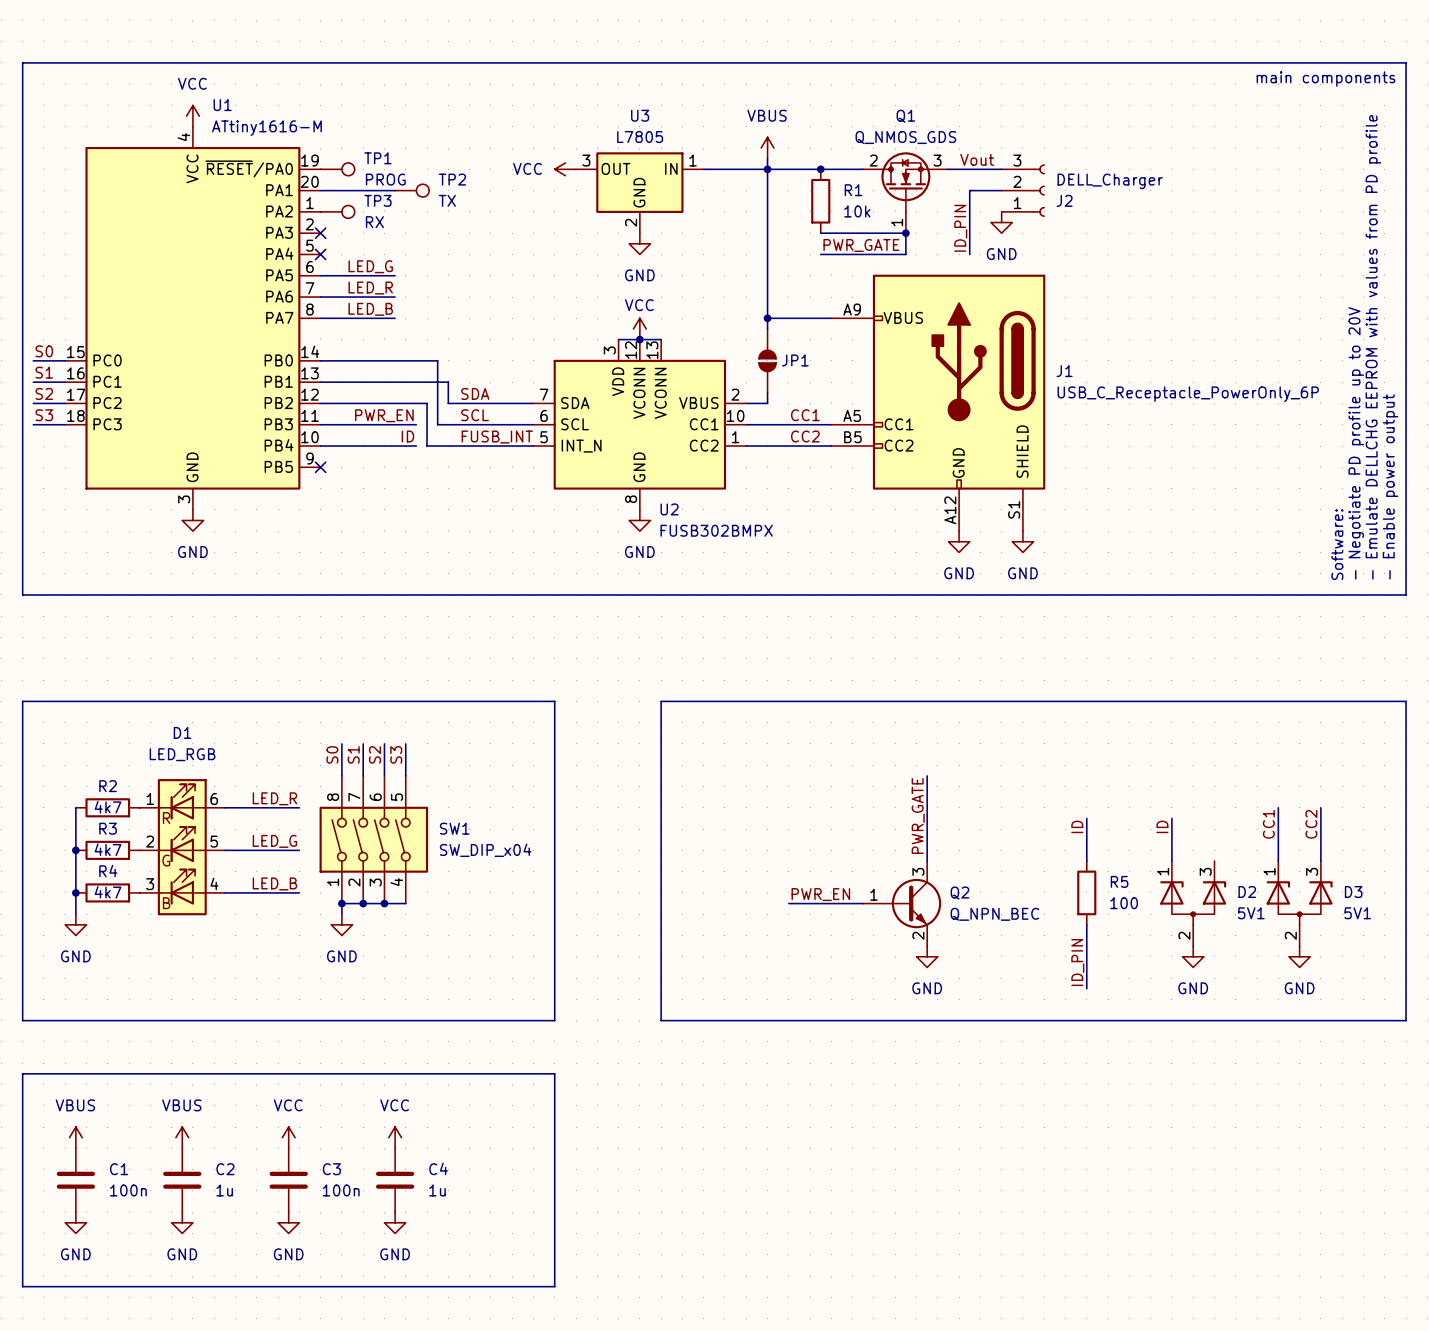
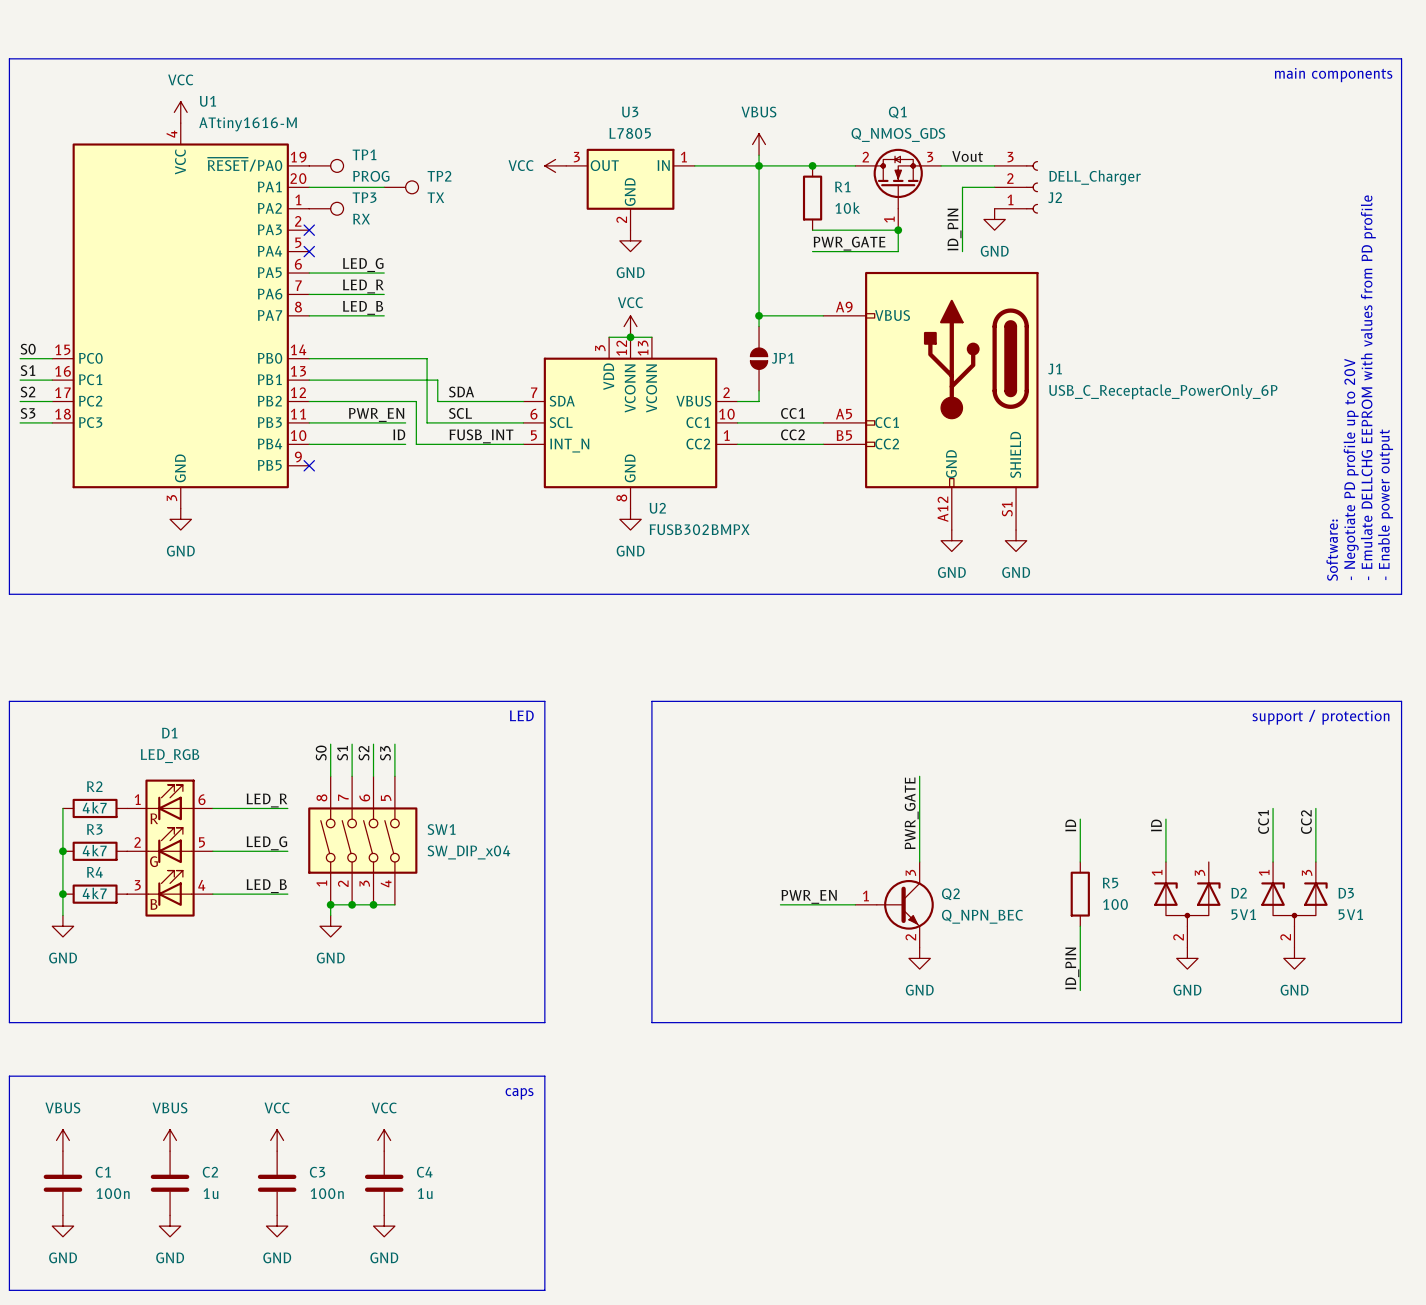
text: none -> LED (521, 715)
text: none -> support / protection (1320, 717)
text: none -> caps (519, 1093)

